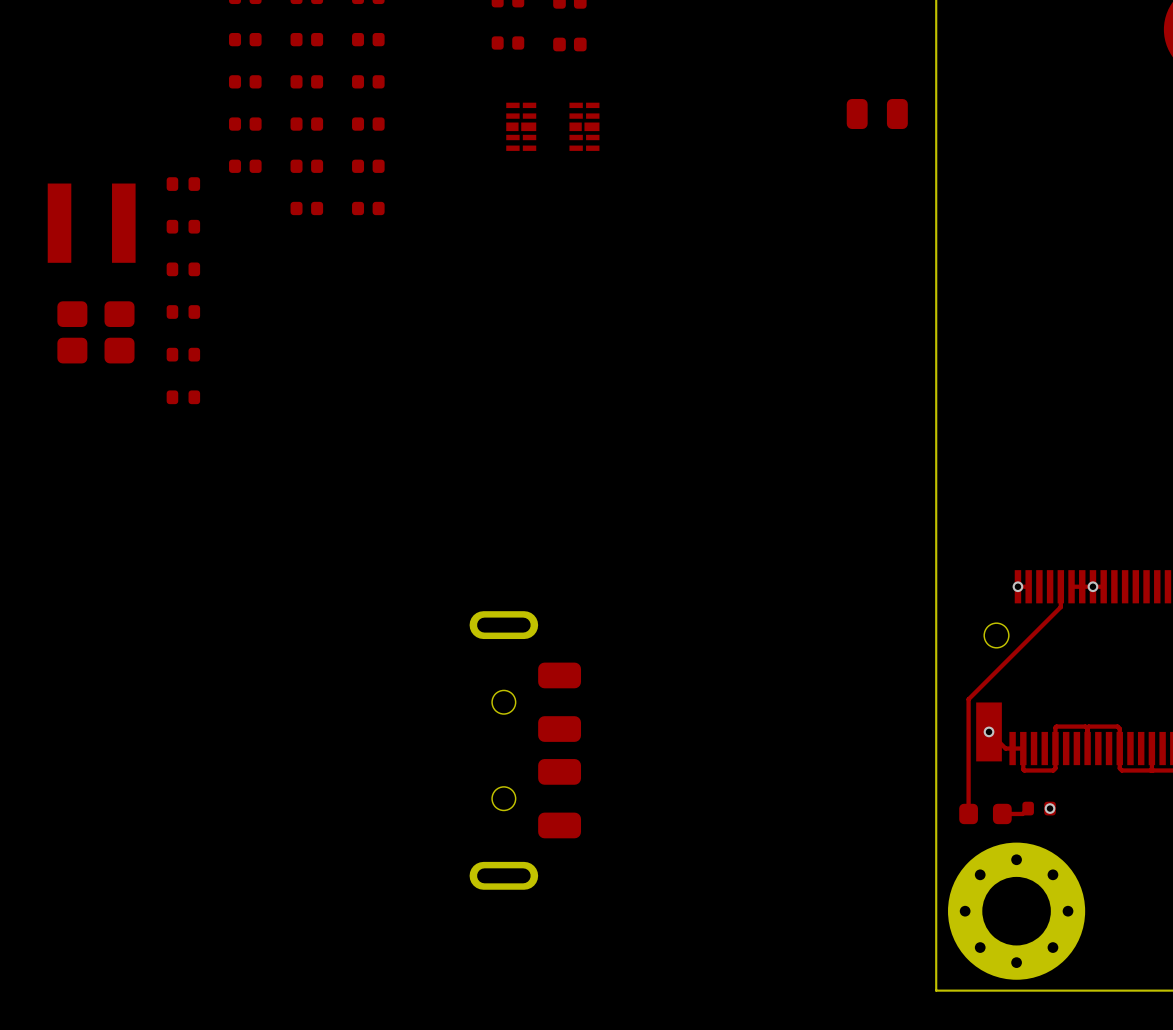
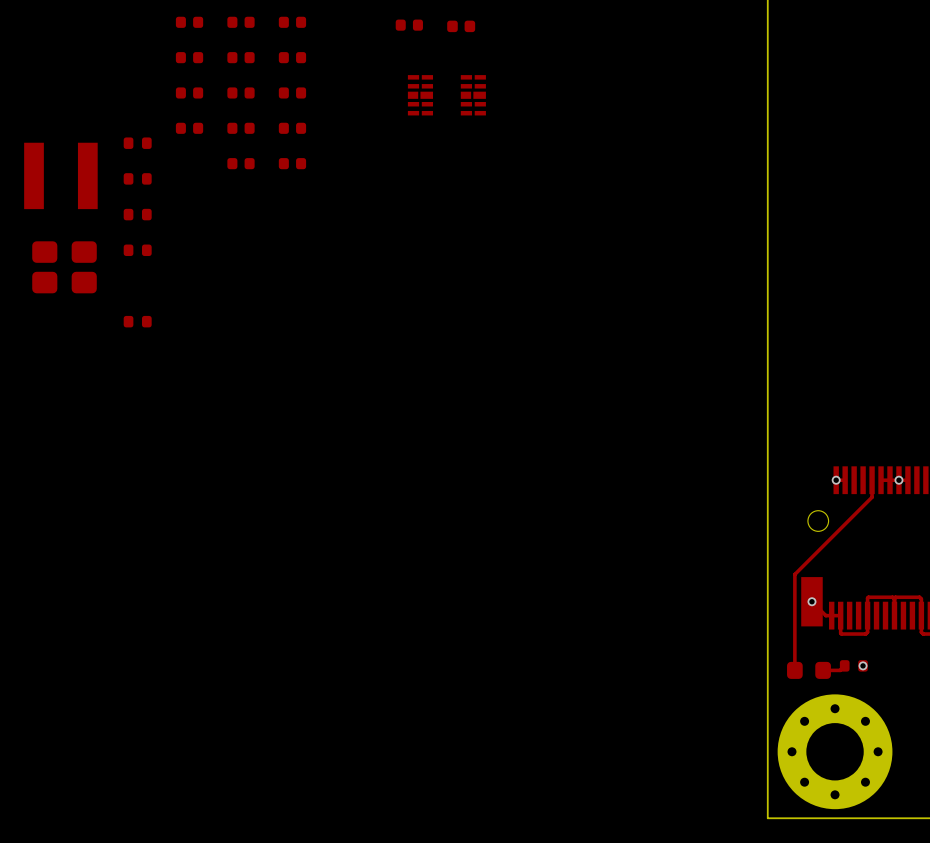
part: (877, 113) -> none
part: (183, 354) -> none
part: (525, 750) -> none

